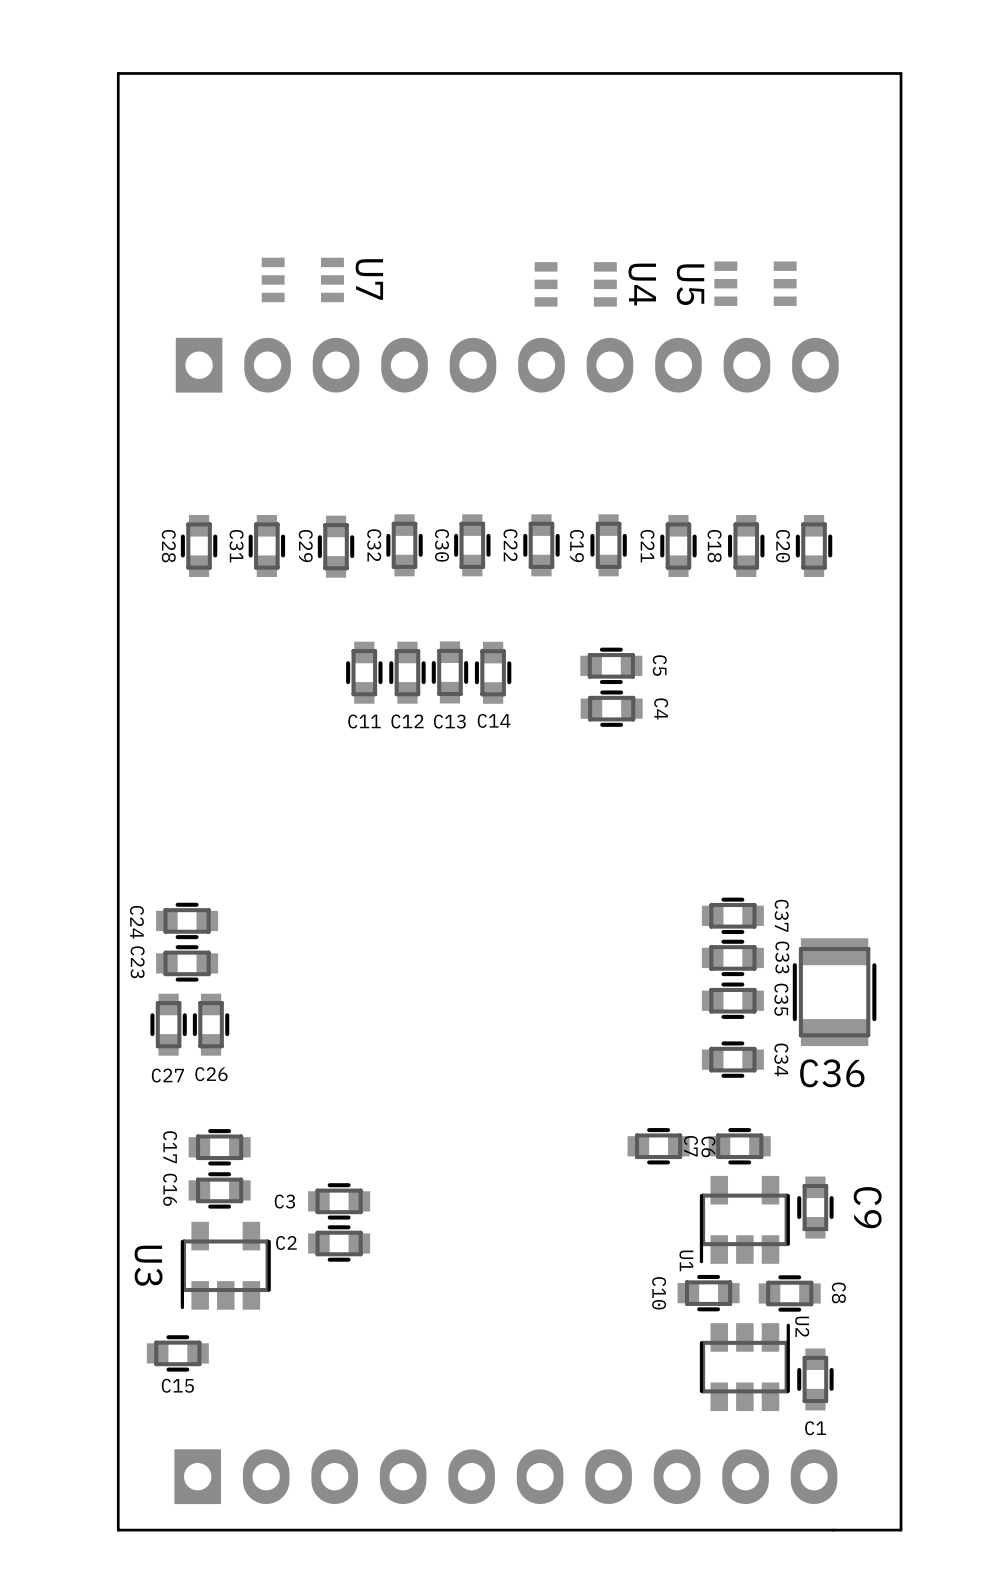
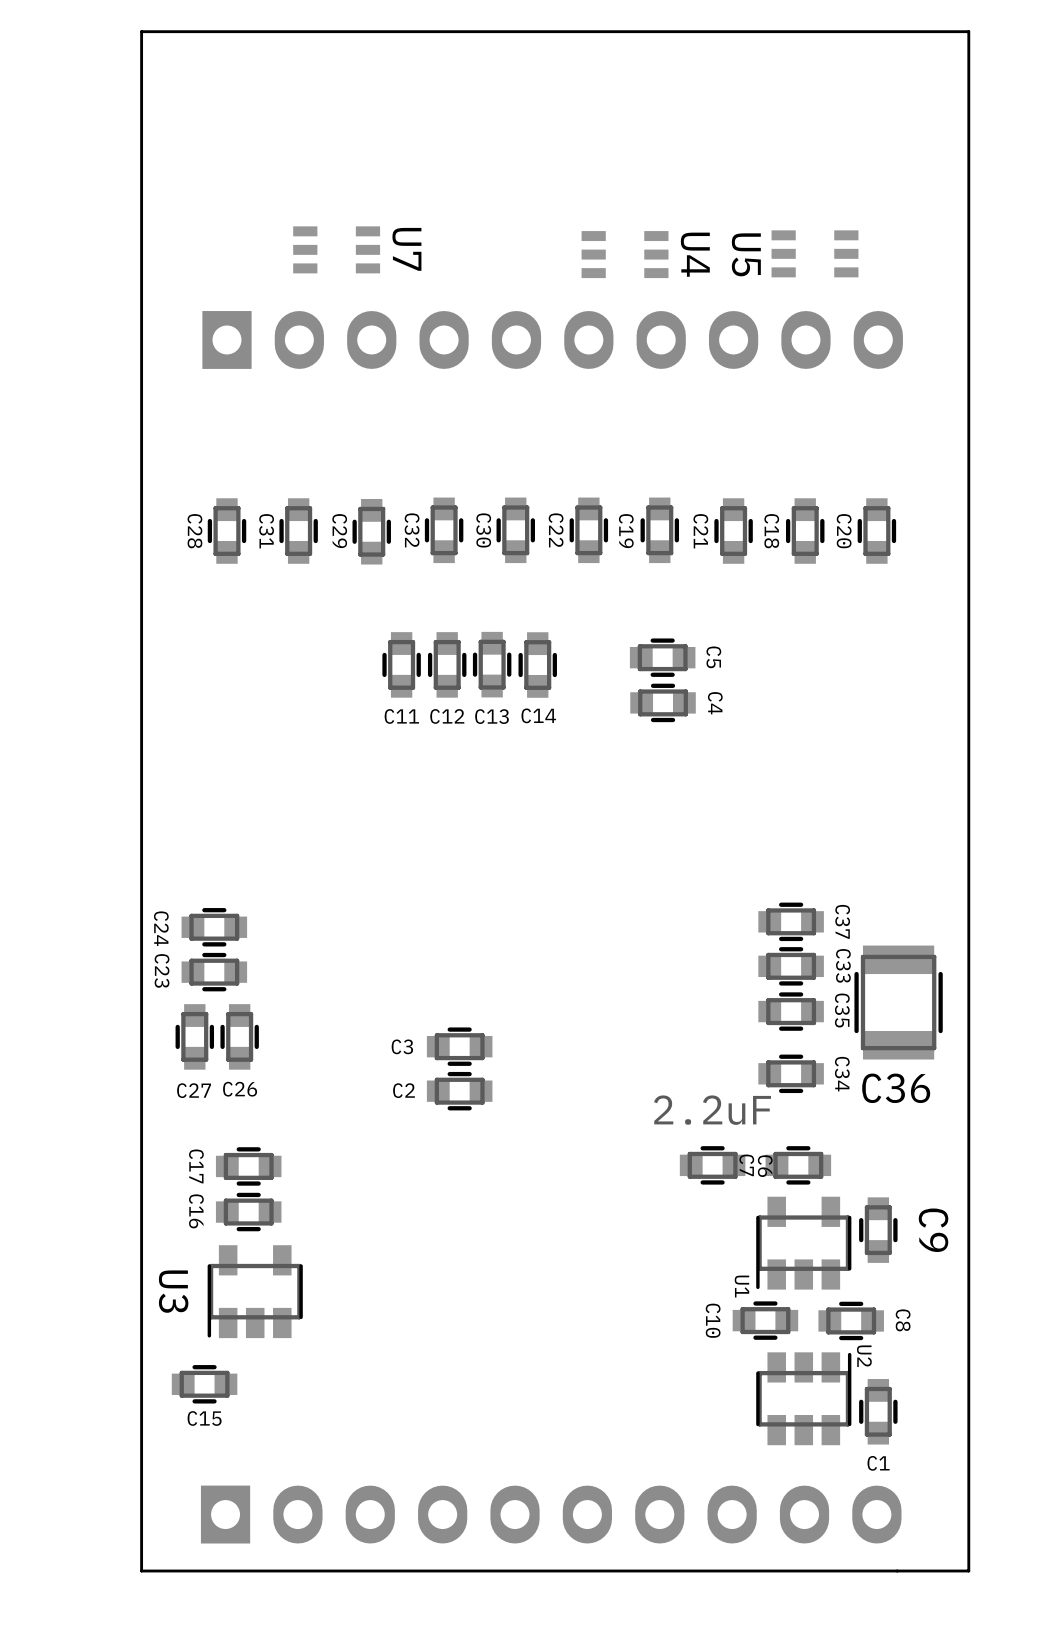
C6 value: none -> 2.2uF (712, 1110)
C3 position: (339, 1201) -> (459, 1046)
C2 position: (339, 1243) -> (459, 1091)

